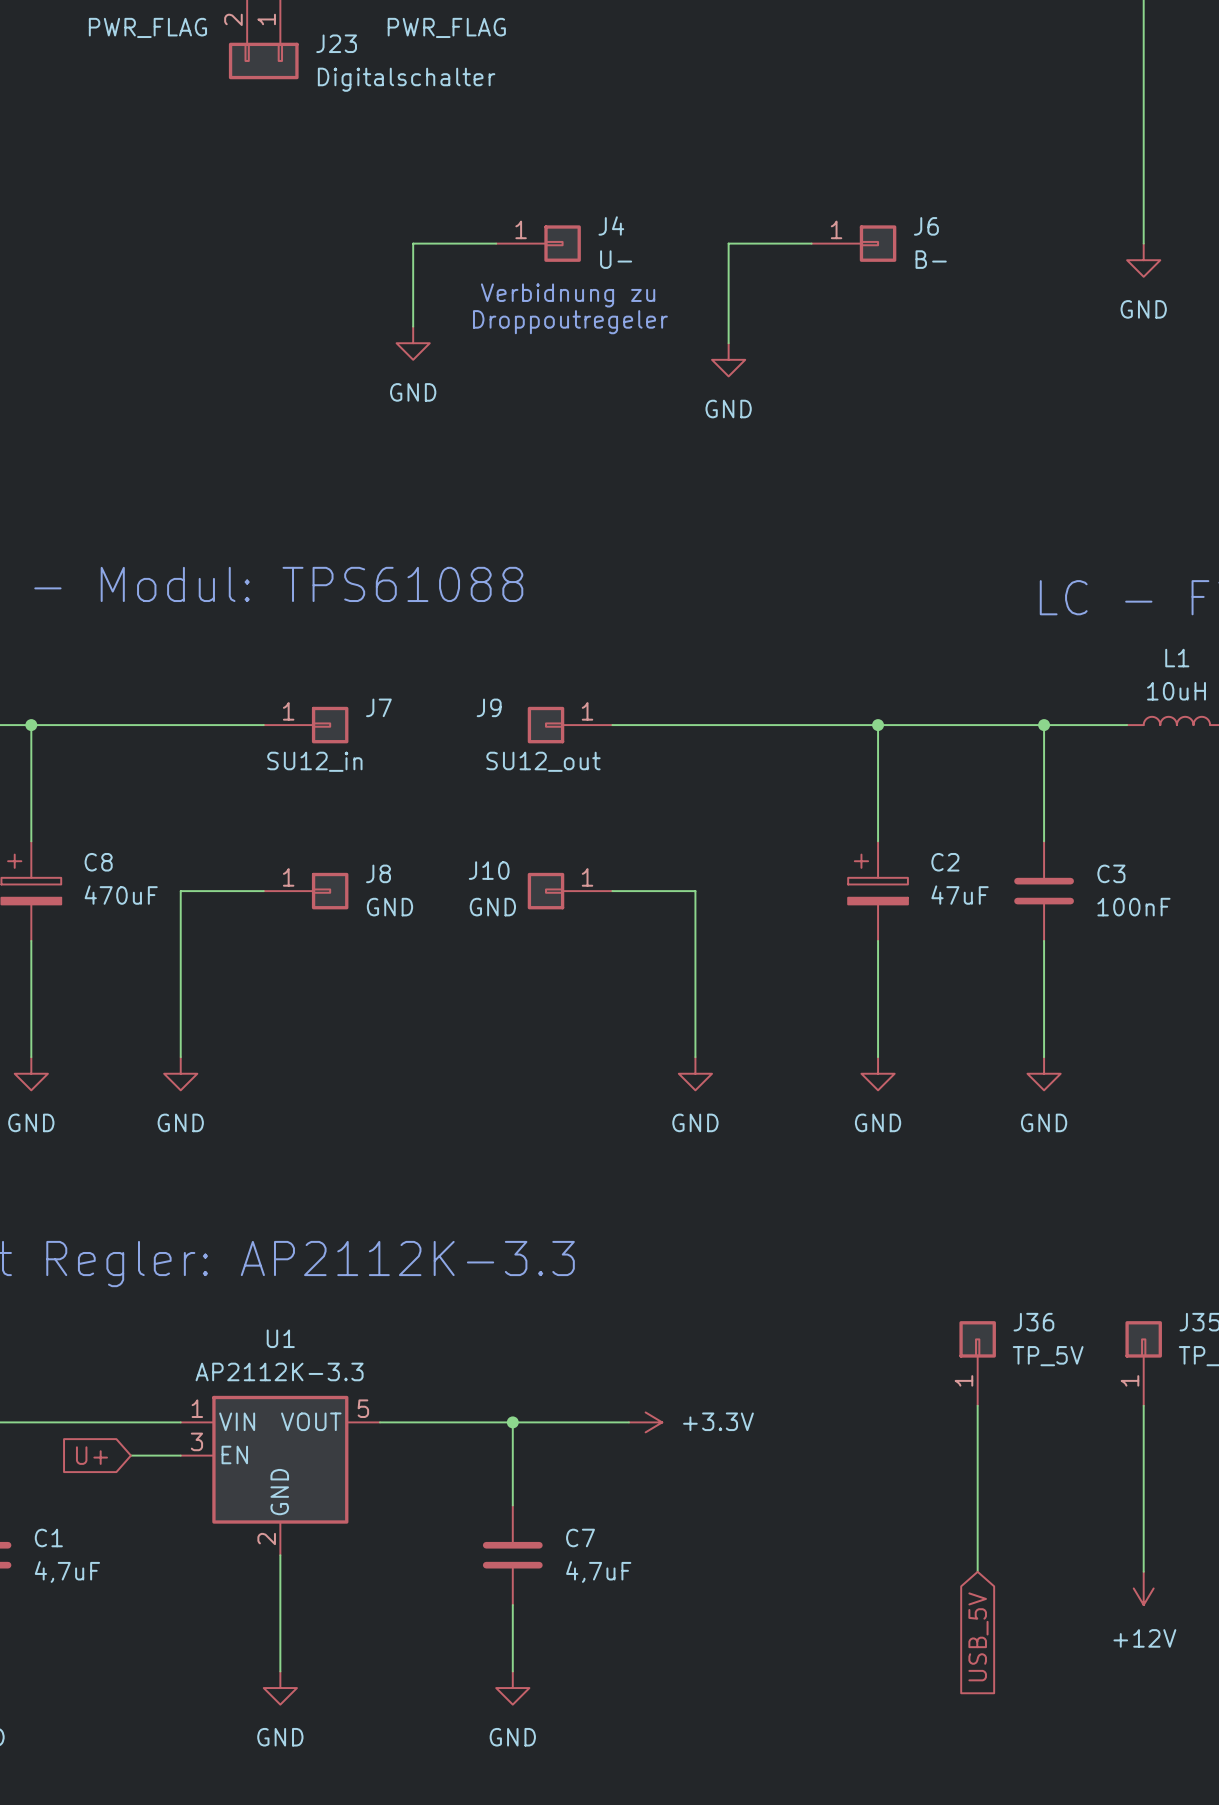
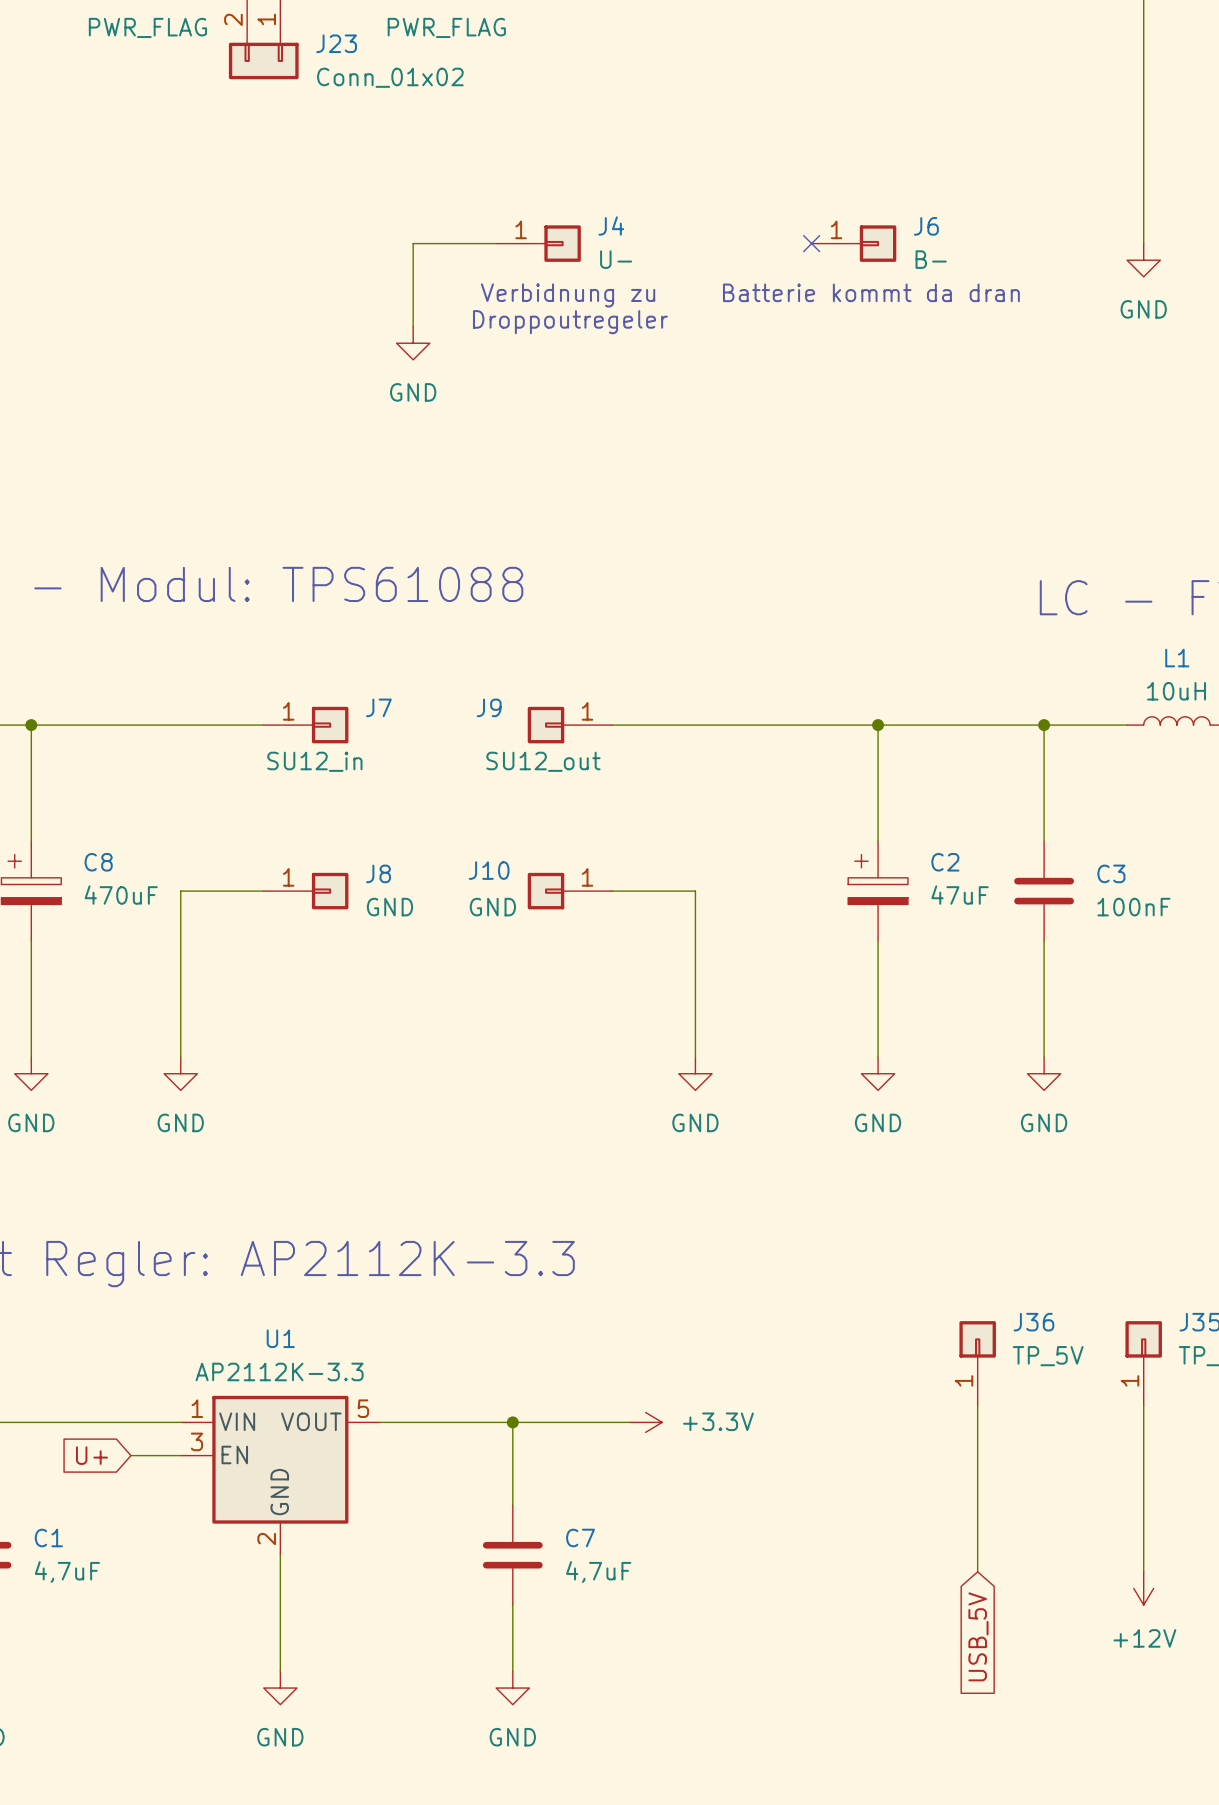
J23 value: Digitalschalter (406, 79) -> Conn_01x02 (390, 77)
wire: (811, 243) (728, 243) (728, 343) -> none
no-connect mark: none -> (811, 243)
text: none -> Batterie kommt da dran (871, 292)
power symbol: GND (728, 359) -> none

